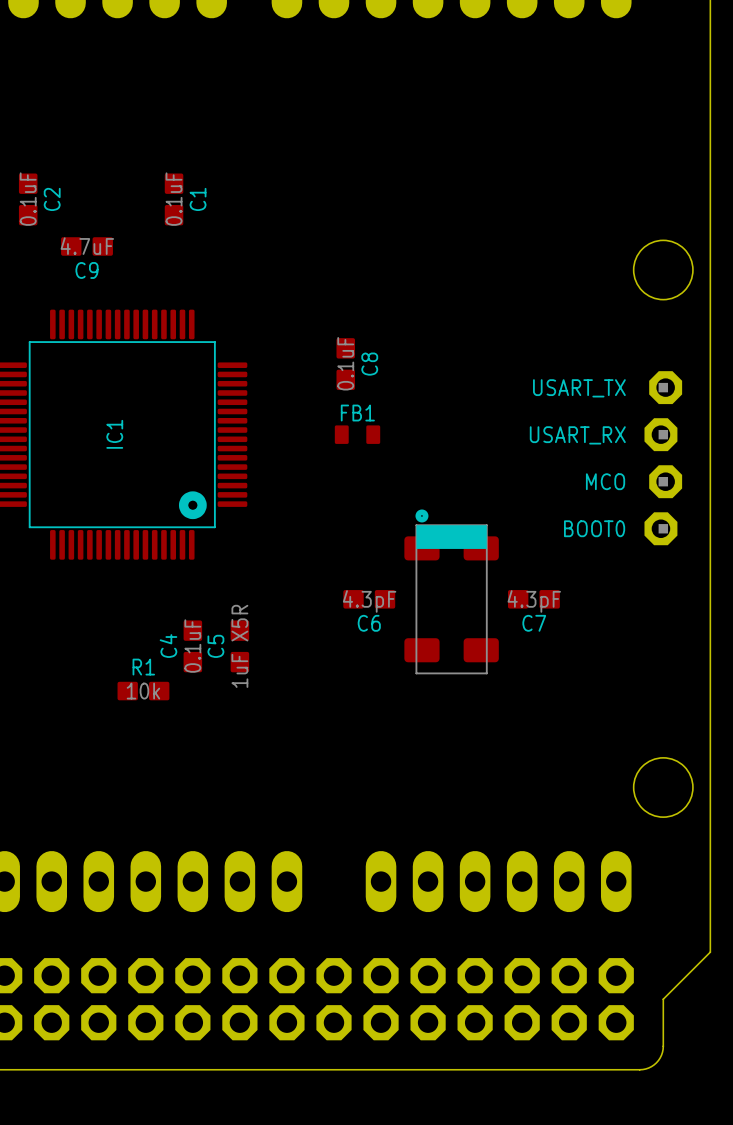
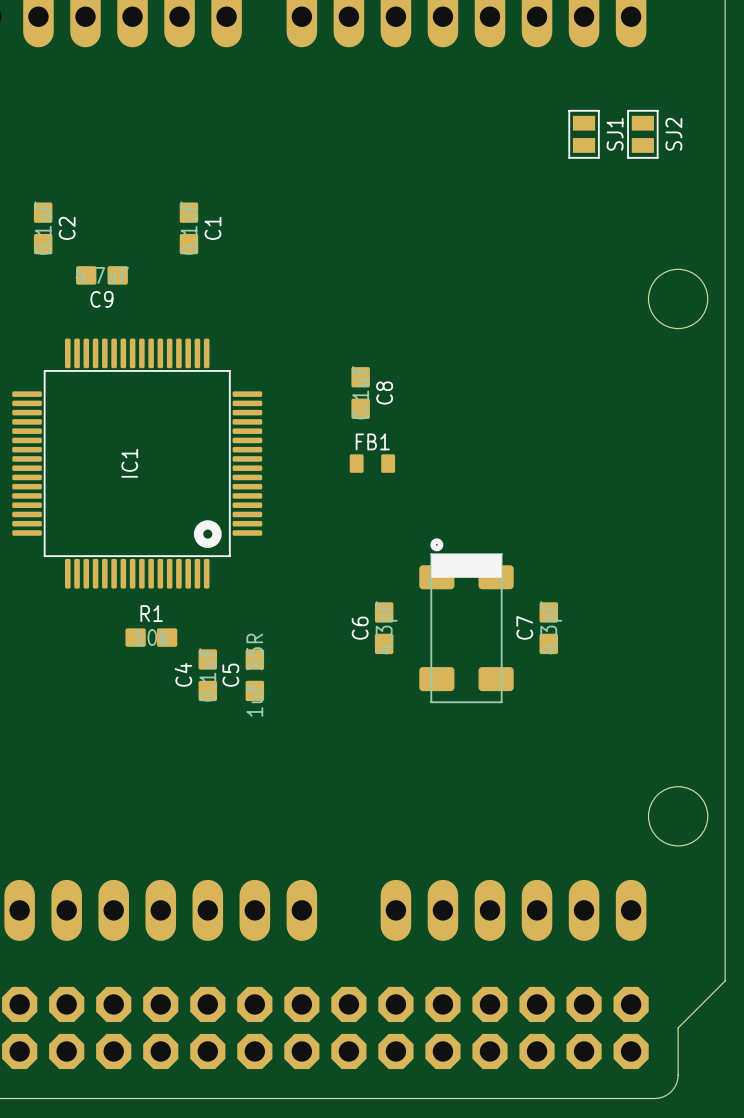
SJ1: none -> (584, 134)
SJ2: none -> (642, 134)
text: USART_TX (579, 388) -> none
text: USART_RX (577, 435) -> none
part: (663, 458) -> none
text: MCO (605, 481) -> none
text: BOOT0 (594, 528) -> none
C6 rotation: 0° (369, 599) -> 90° clockwise (384, 628)
C7 rotation: 0° (533, 599) -> 90° clockwise (548, 628)
R1 position: (143, 691) -> (151, 637)

